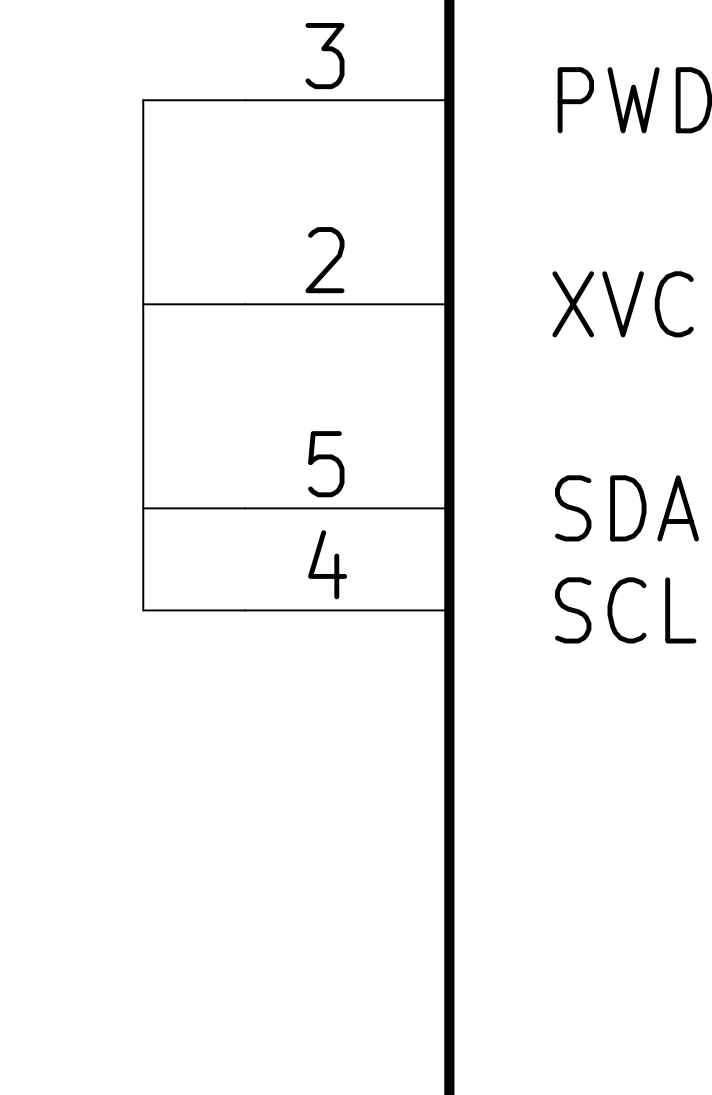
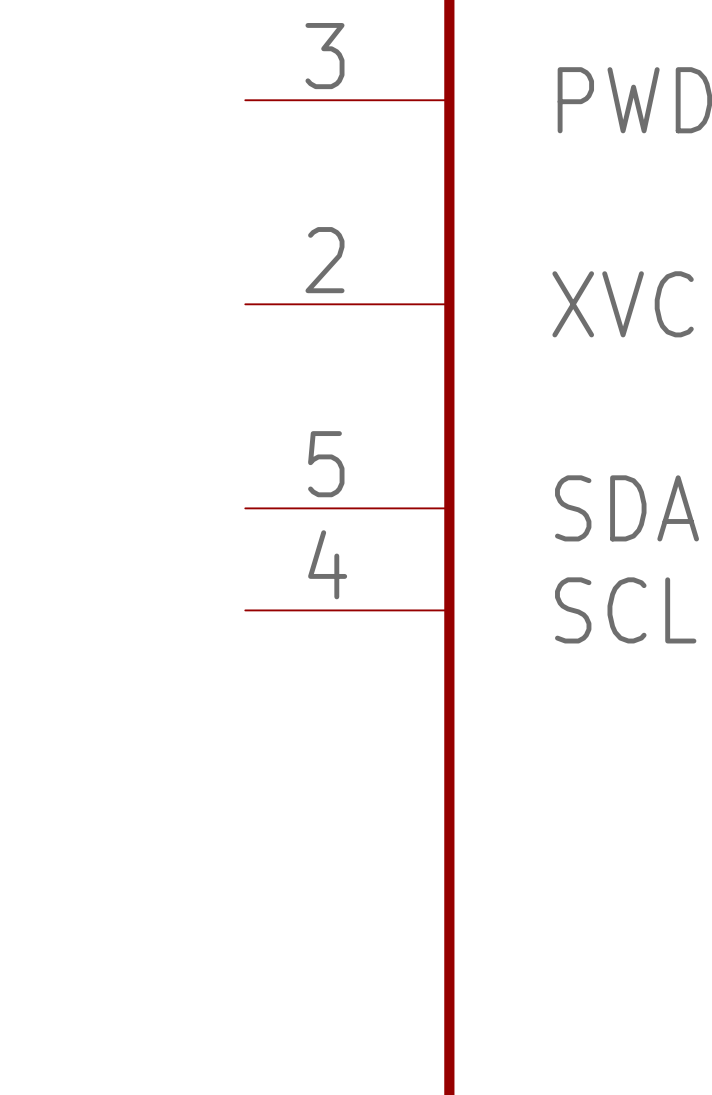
bus: (143, 100) (143, 610) -> none
wire: (143, 100) (245, 100) -> none
wire: (143, 304) (245, 304) -> none
wire: (143, 508) (245, 508) -> none
wire: (143, 610) (245, 610) -> none

